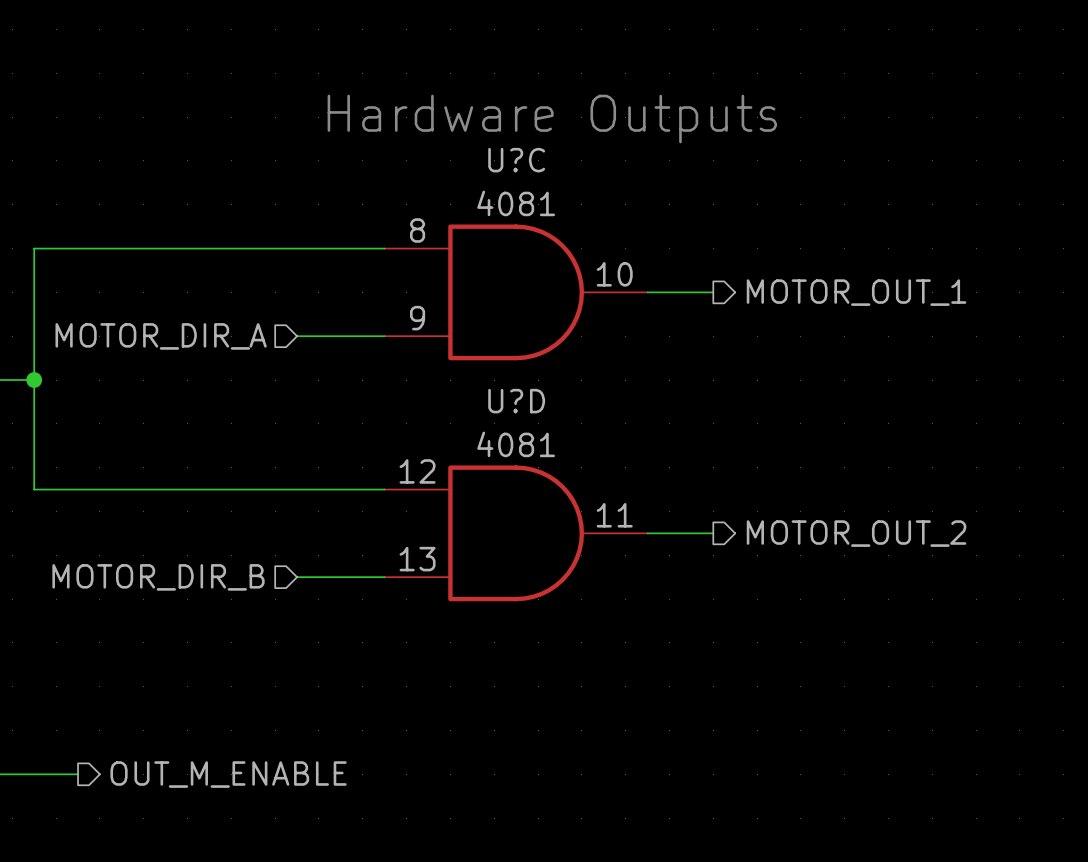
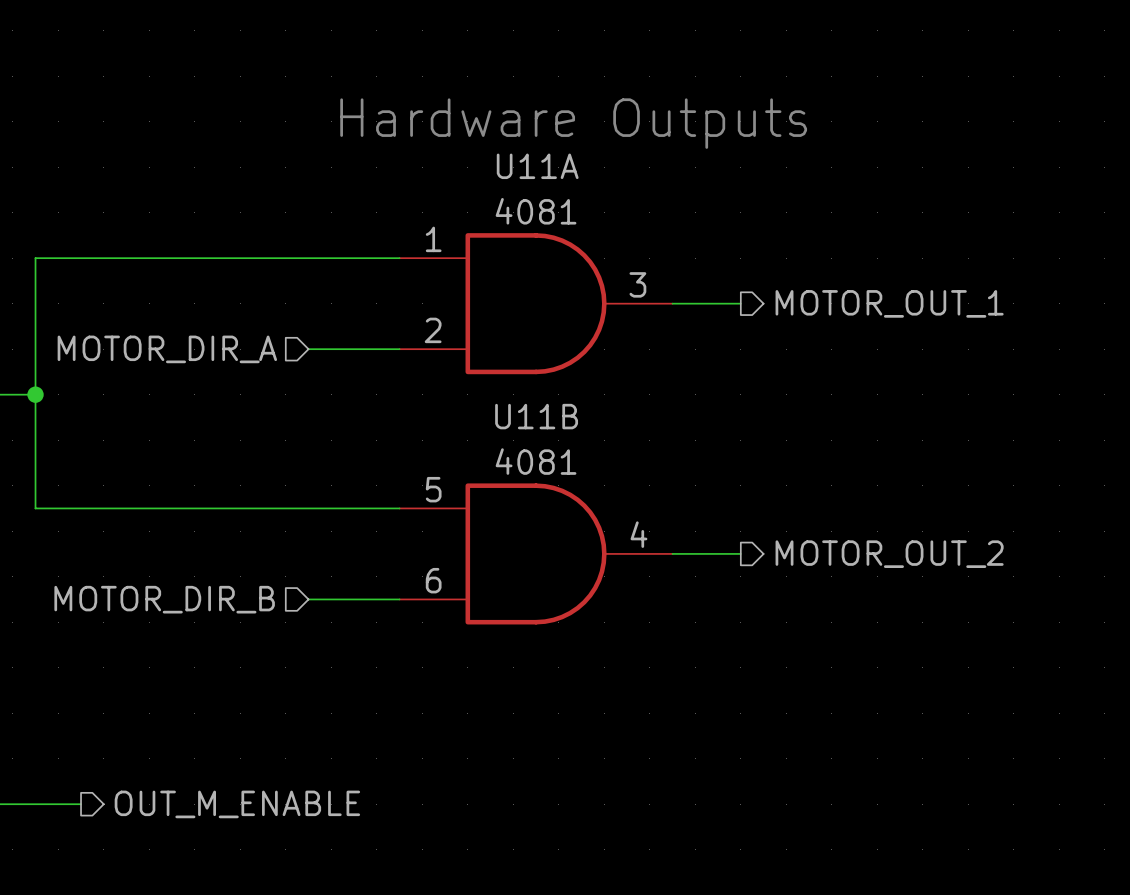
U?C name: U?C (516, 160) -> U11A (537, 166)
U?C pin number: 8 (417, 230) -> 1 (433, 239)
U?C pin number: 10 (614, 274) -> 3 (637, 284)
U?C pin number: 9 (417, 318) -> 2 (433, 330)
U?D name: U?D (516, 401) -> U11B (536, 416)
U?D pin number: 12 (417, 471) -> 5 (433, 489)
U?D pin number: 11 (614, 515) -> 4 (638, 534)
U?D pin number: 13 (417, 559) -> 6 (433, 580)

